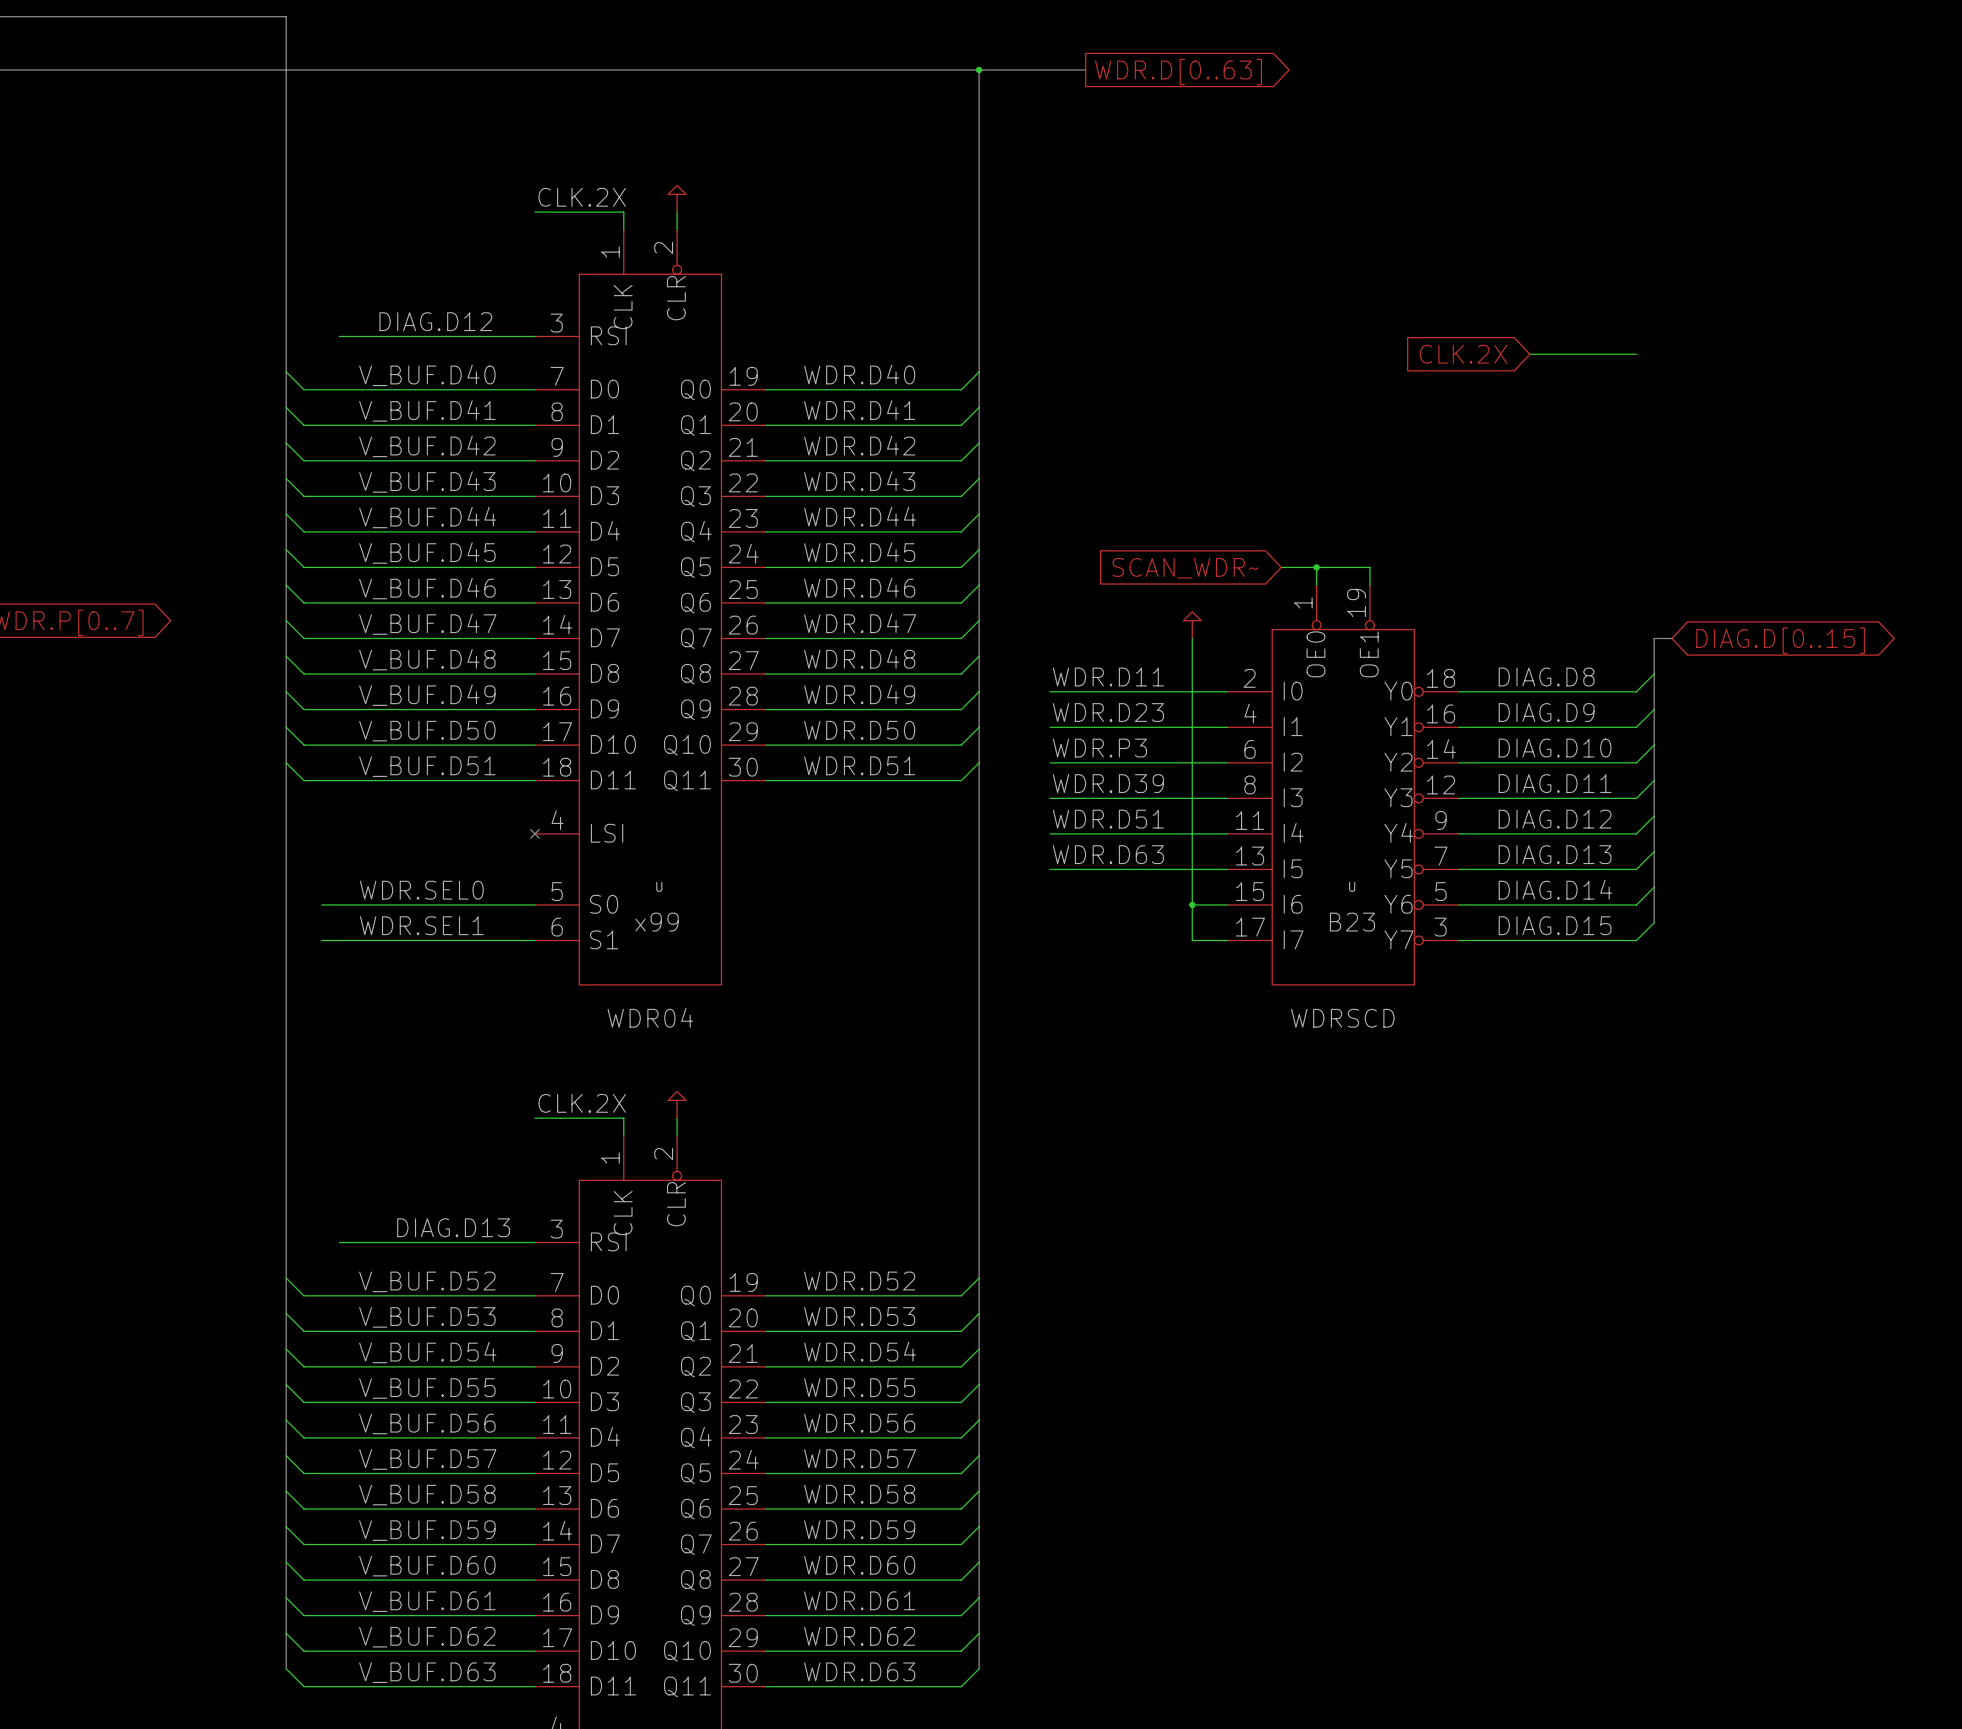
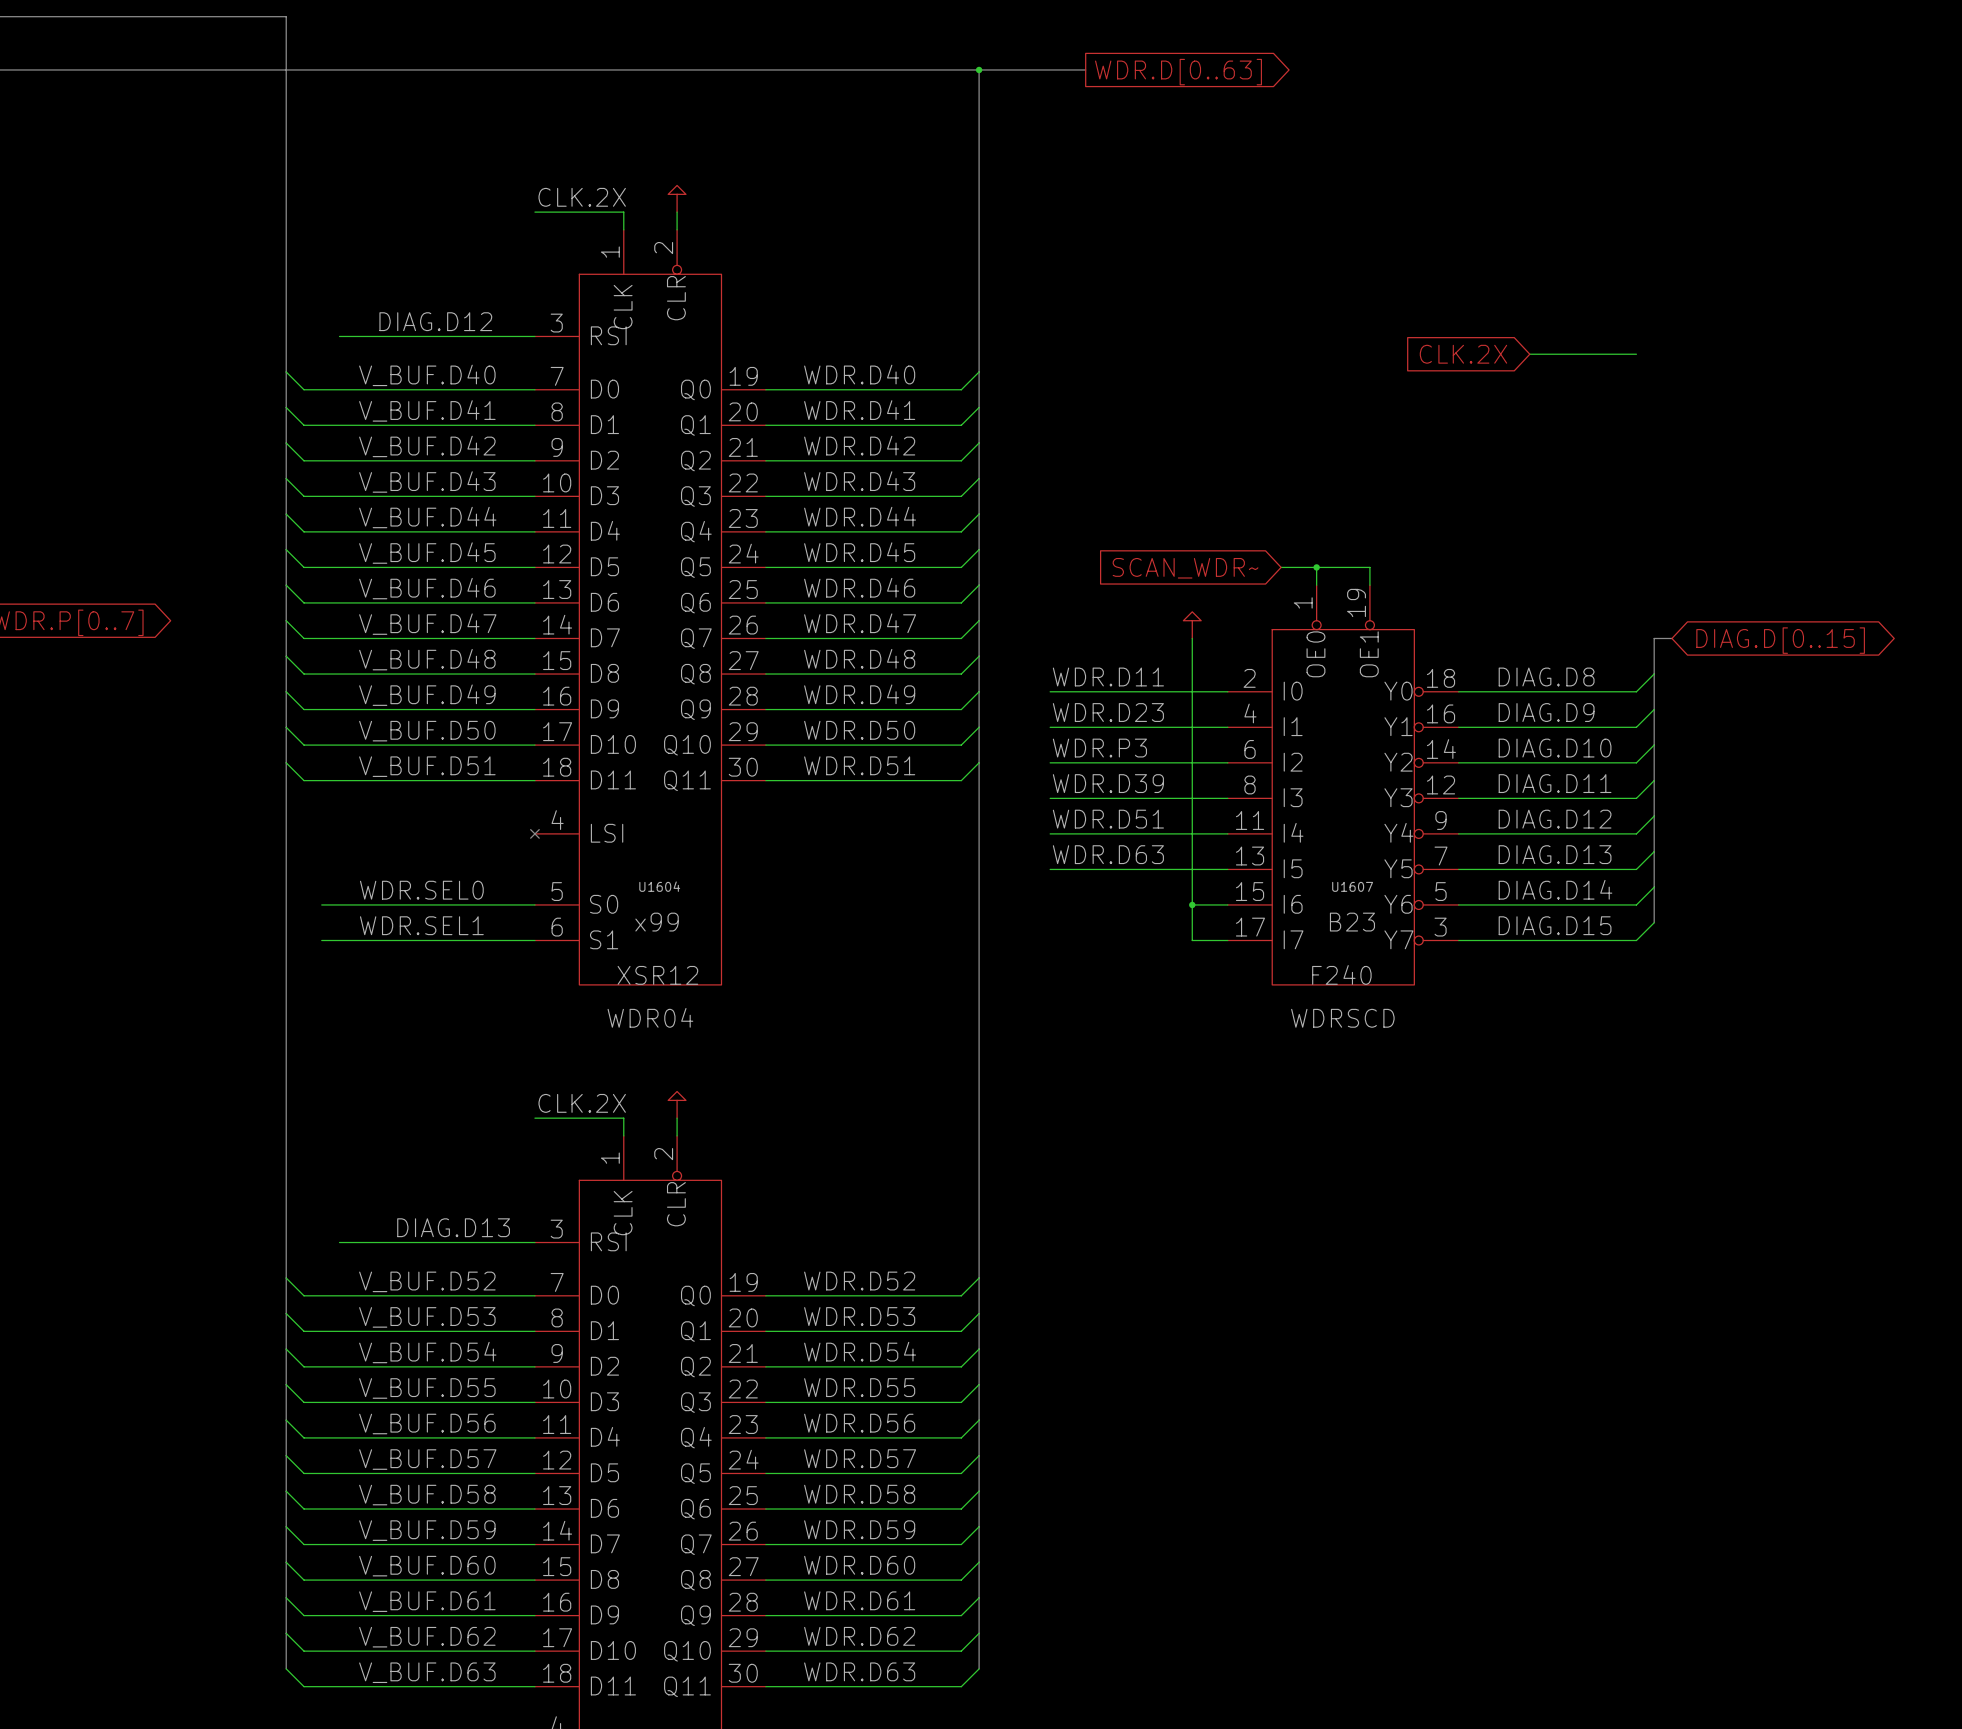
U name: U (659, 886) -> U1604 (659, 886)
U name: U (1352, 886) -> U1607 (1352, 886)
U value: none -> F240 (1341, 974)
U value: none -> XSR12 (657, 975)

